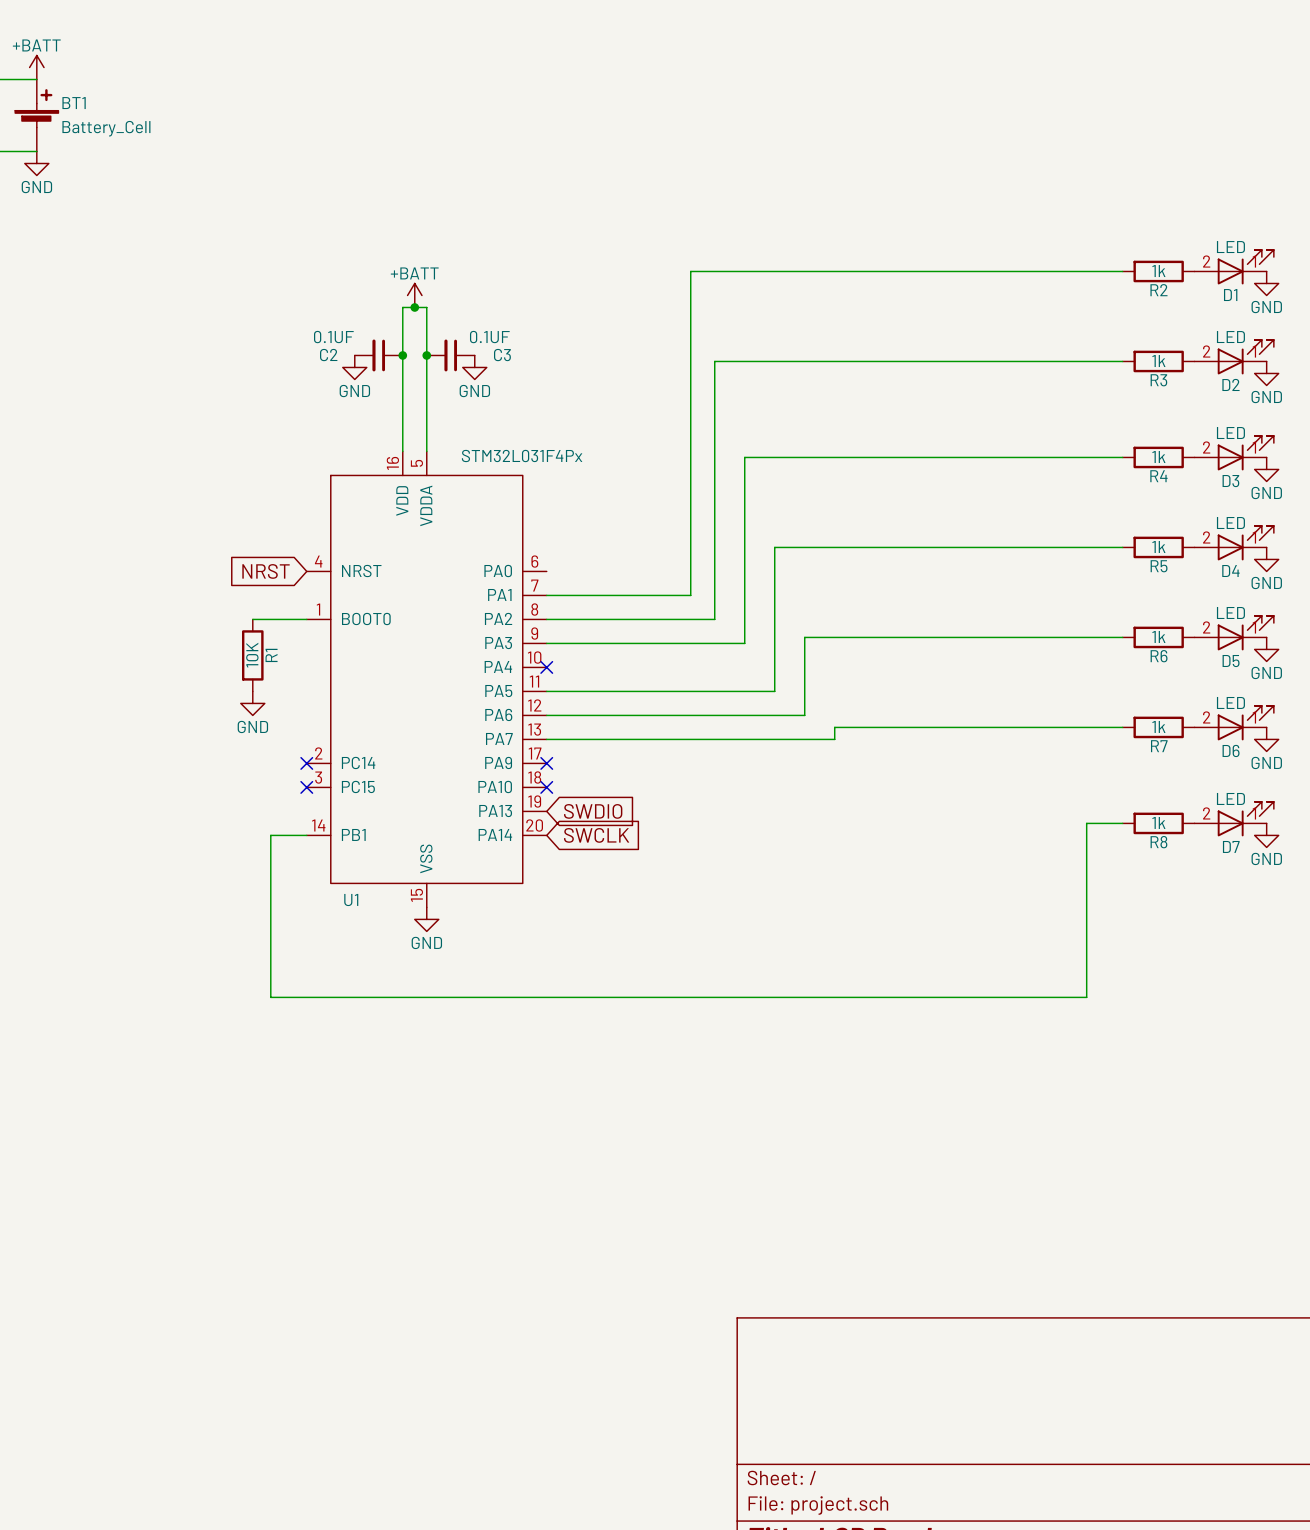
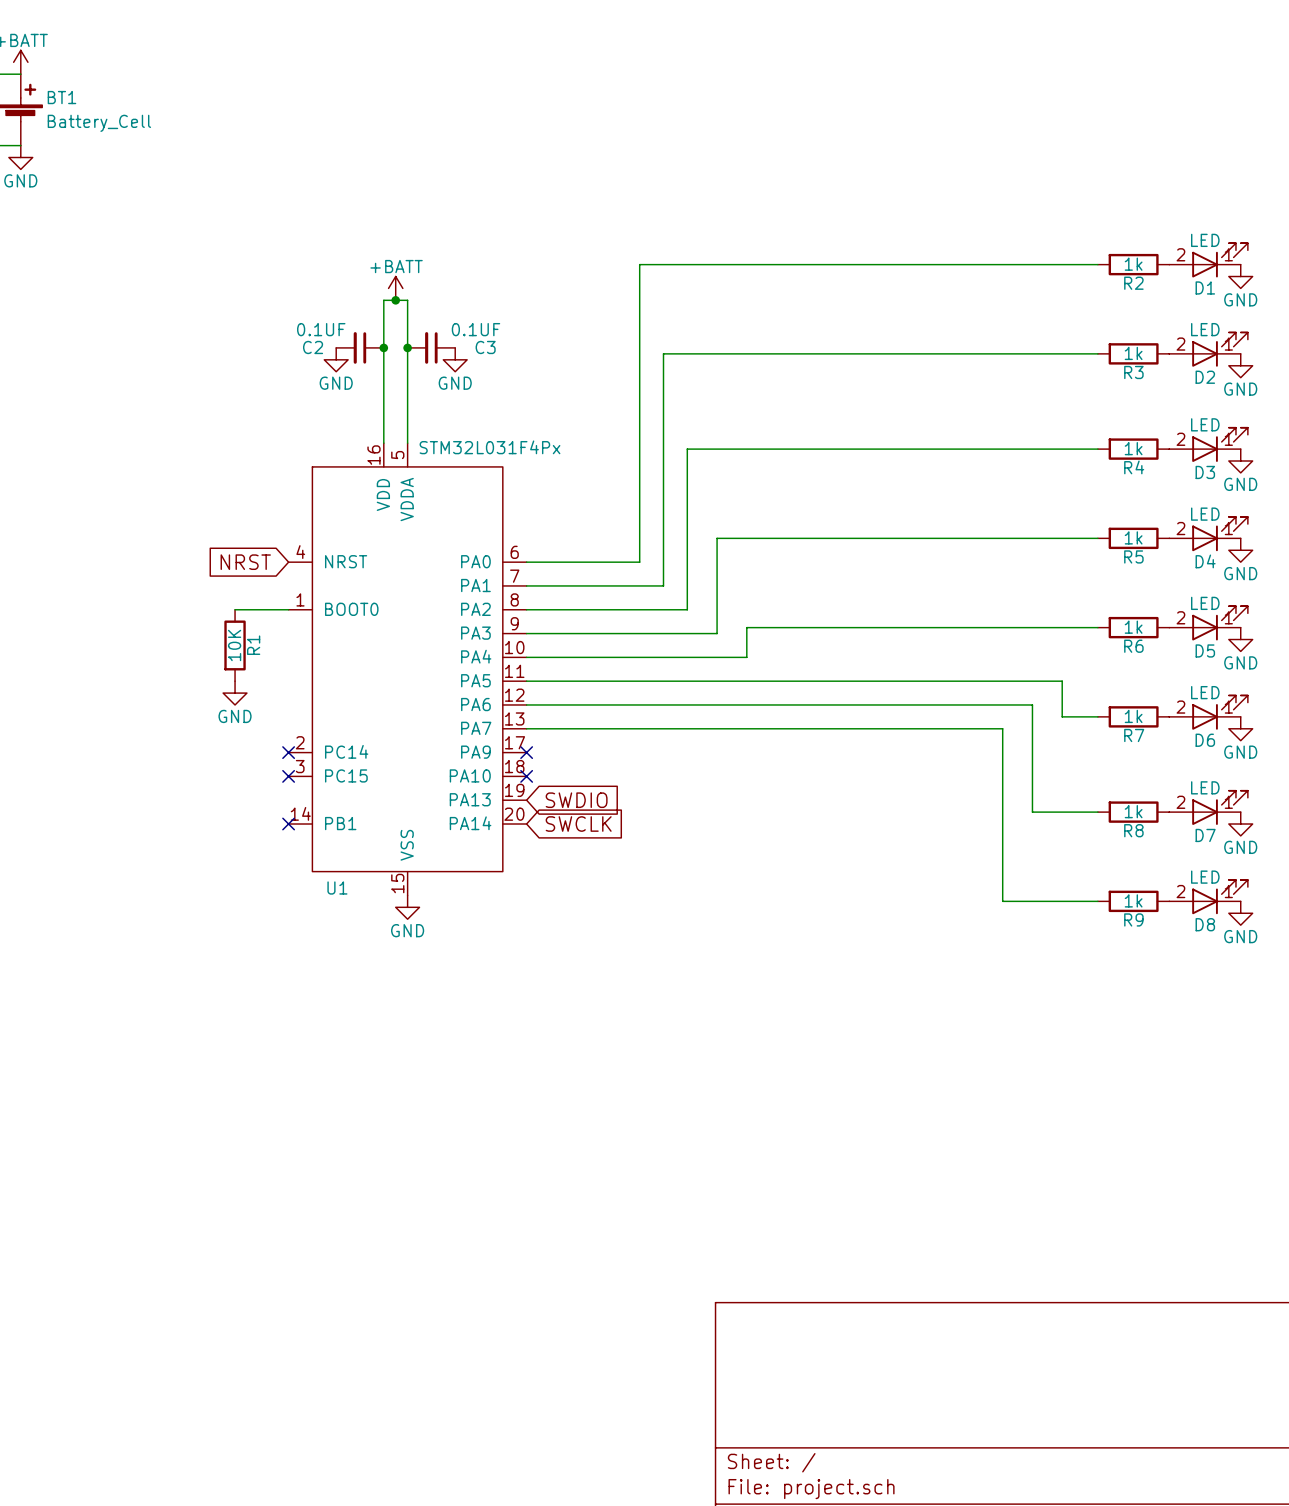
wire: (690, 271) (690, 595) (684, 595) -> (669, 264) (639, 264) (639, 562) (526, 562)
wire: (714, 361) (714, 619) (708, 619) -> (693, 353) (663, 353) (663, 585)
wire: (744, 457) (744, 643) (738, 643) -> (723, 449) (687, 449) (687, 609)
wire: (774, 547) (774, 691) -> (752, 538) (717, 538) (717, 633)
wire: (804, 637) (804, 715) -> (782, 627) (746, 627) (746, 657) (526, 657)
no-connect mark: (546, 667) -> none
wire: (1086, 727) (834, 727) (834, 739) -> (1062, 716) (1062, 681) (752, 681)
wire: none -> (812, 728) (1002, 728) (1002, 901) (1097, 901)
wire: (1086, 823) (1086, 997) (270, 997) (270, 835) (306, 835) -> (1062, 812) (1032, 812) (1032, 704) (782, 704)
no-connect mark: none -> (288, 824)
D8: none -> LED (1208, 897)
R9: none -> 1k (1133, 901)
power symbol: none -> GND (1240, 913)

